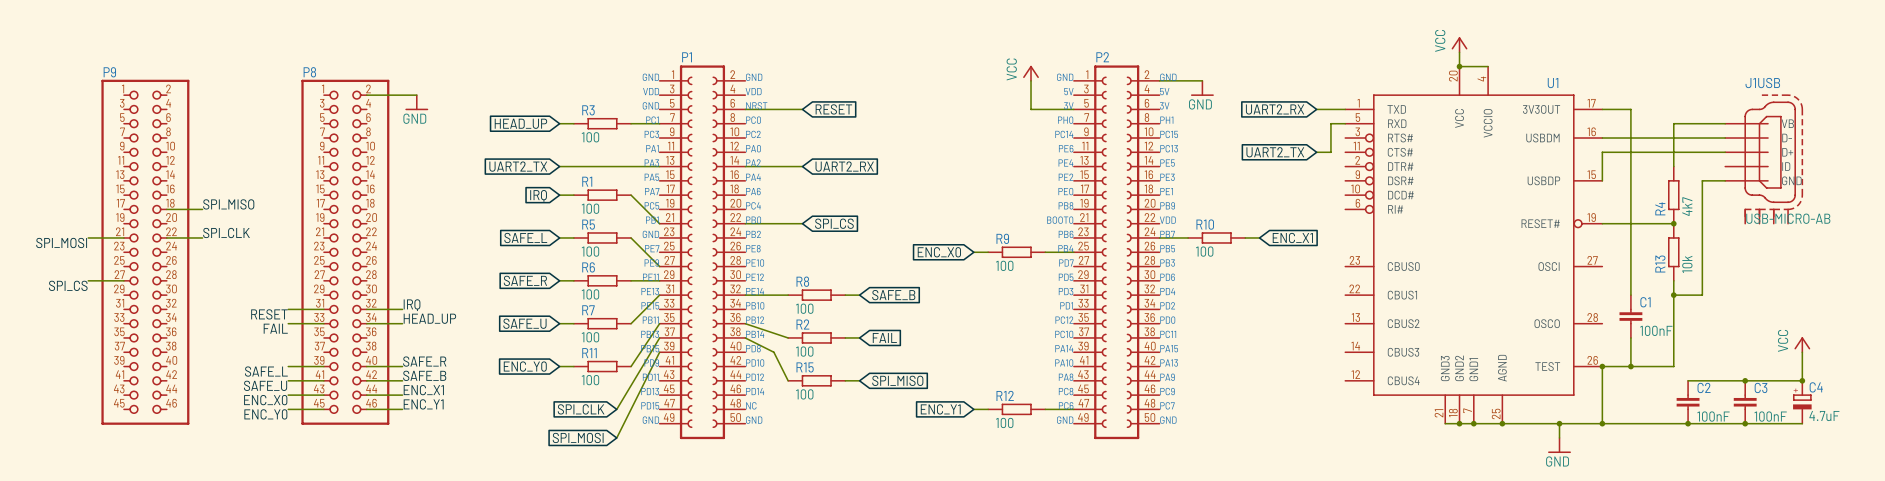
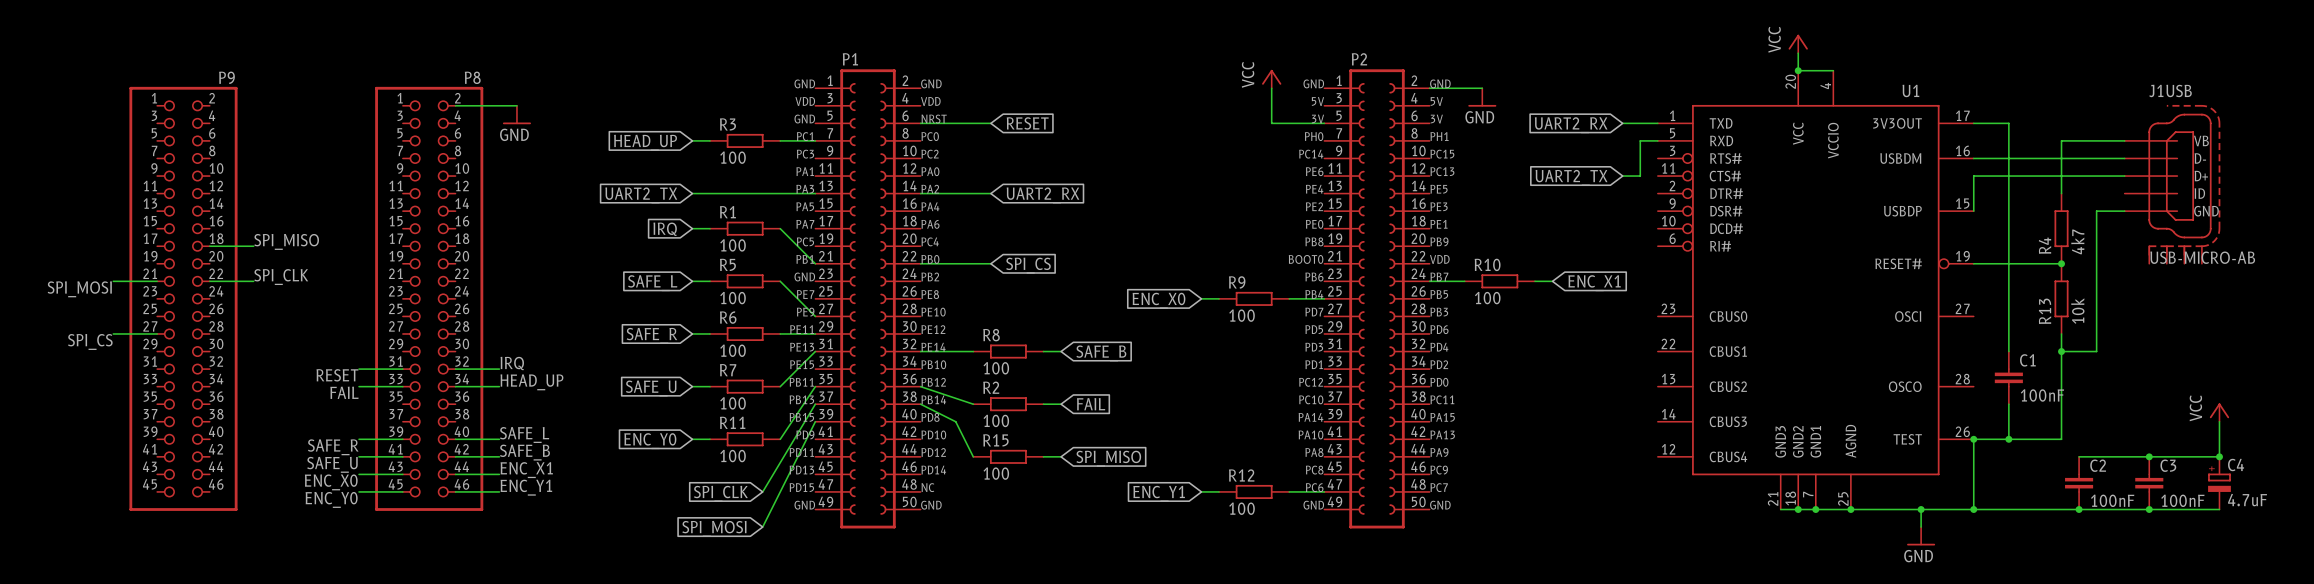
P9 name position: P9 (109, 72) -> P9 (226, 77)
P8 name position: P8 (309, 72) -> P8 (472, 77)
label: SAFE_R (424, 361) -> SAFE_L (524, 434)
label: SAFE_L (266, 371) -> SAFE_R (333, 447)

